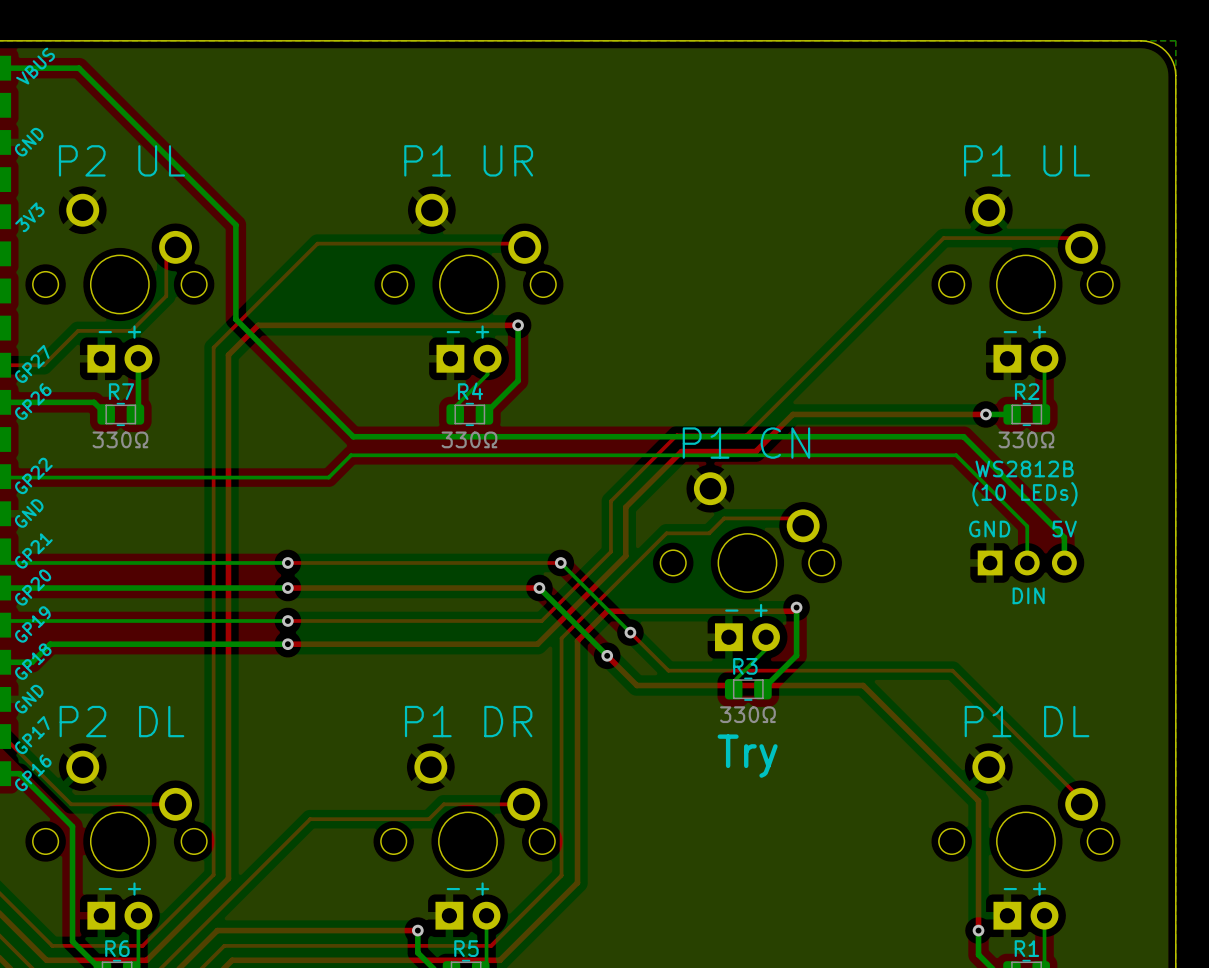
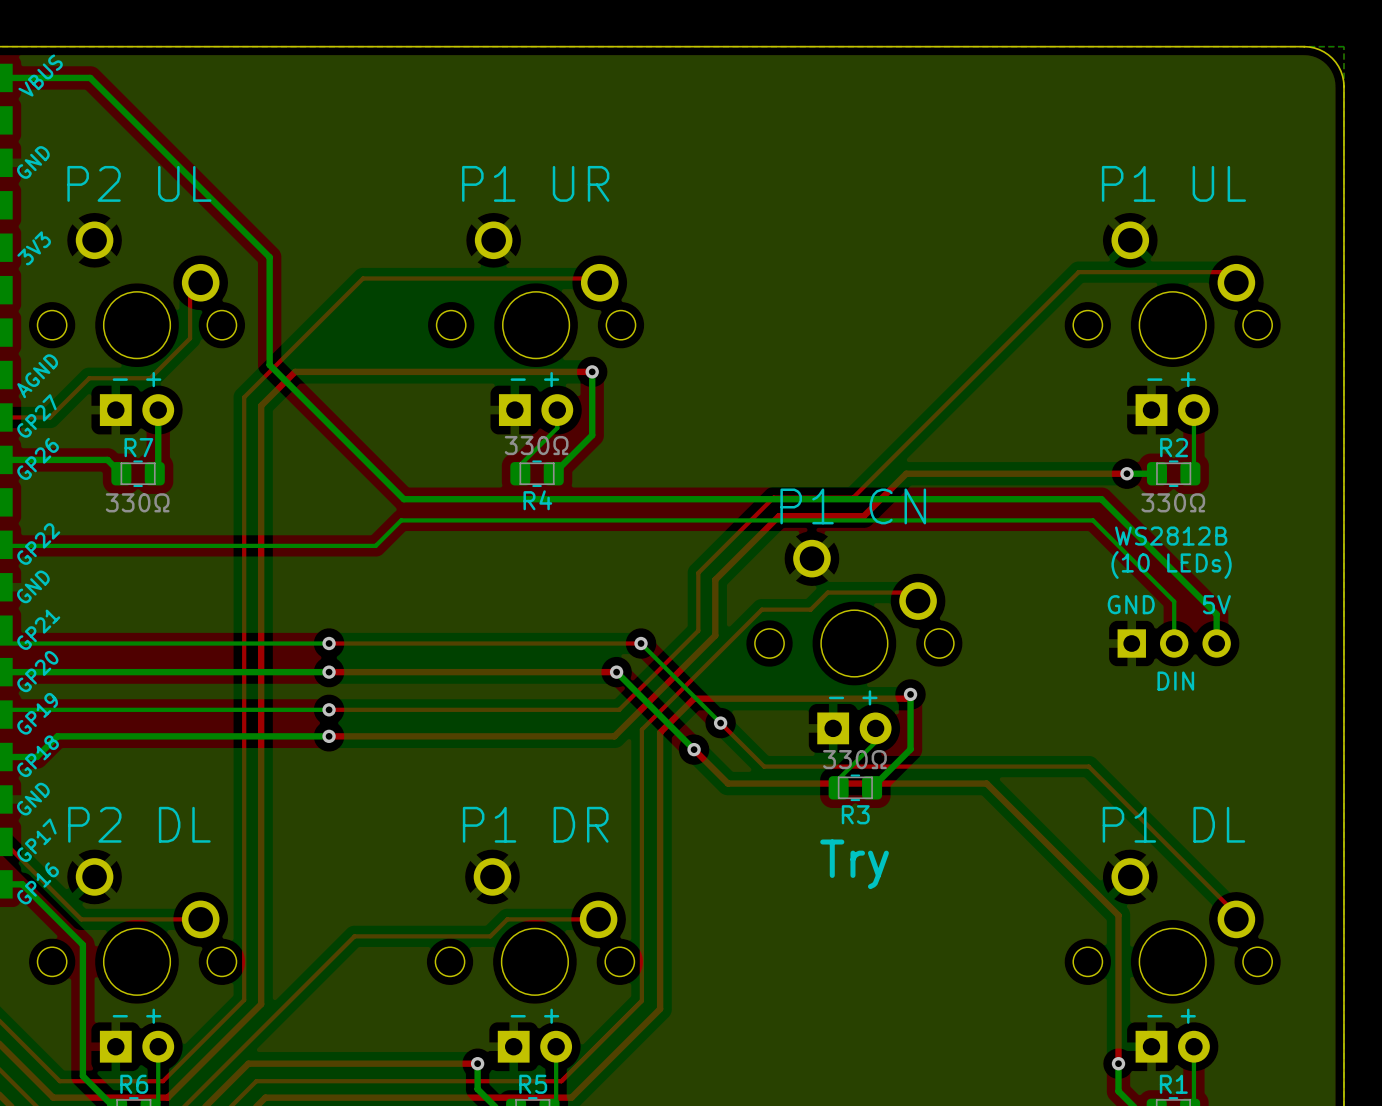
part text: none -> AGND (37, 376)
R4 name position: R4 (470, 391) -> R4 (537, 500)
R4 value position: 330Ω (469, 439) -> 330Ω (536, 445)
R3 name position: R3 (745, 666) -> R3 (855, 814)
R3 value position: 330Ω (747, 714) -> 330Ω (854, 759)

